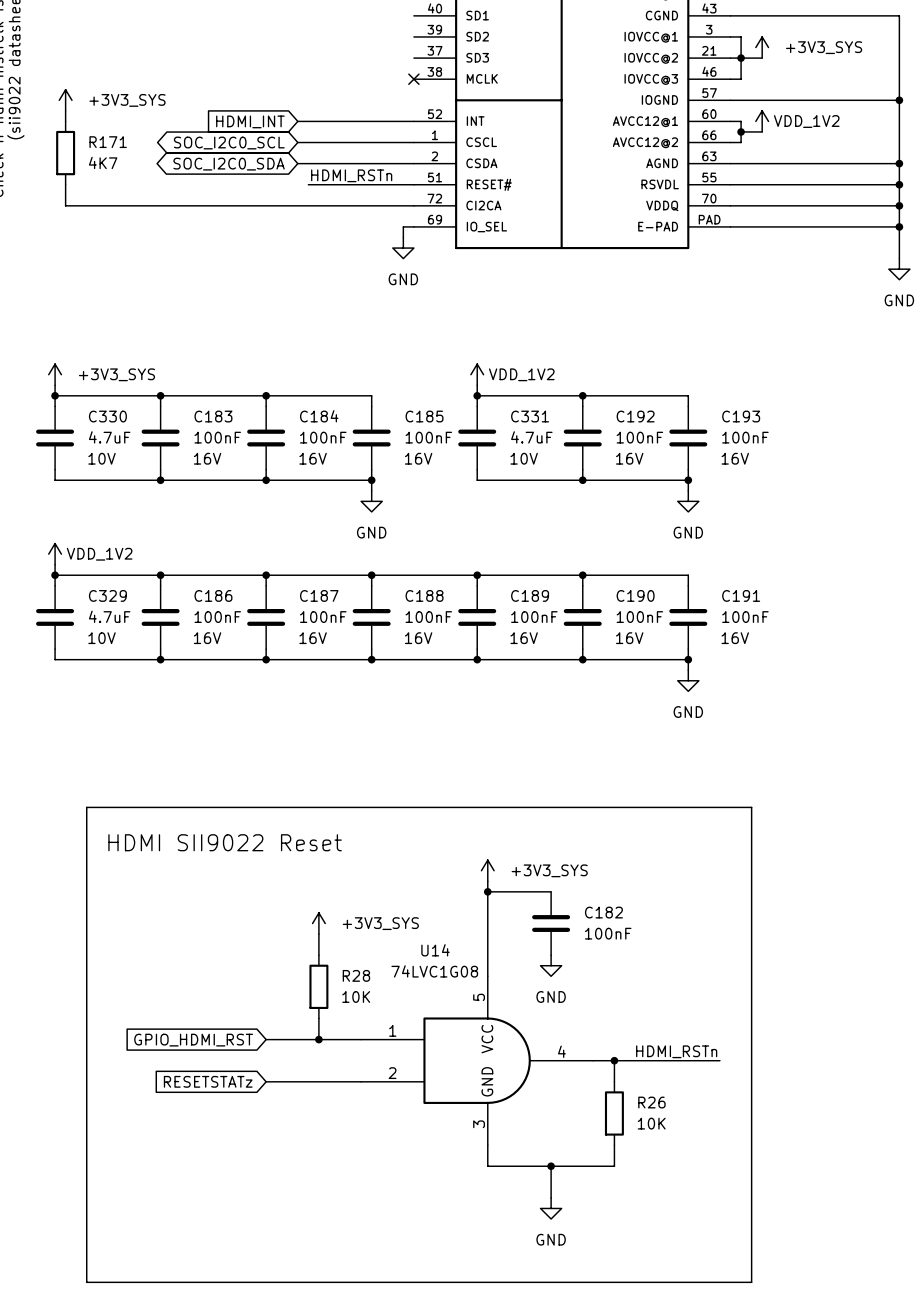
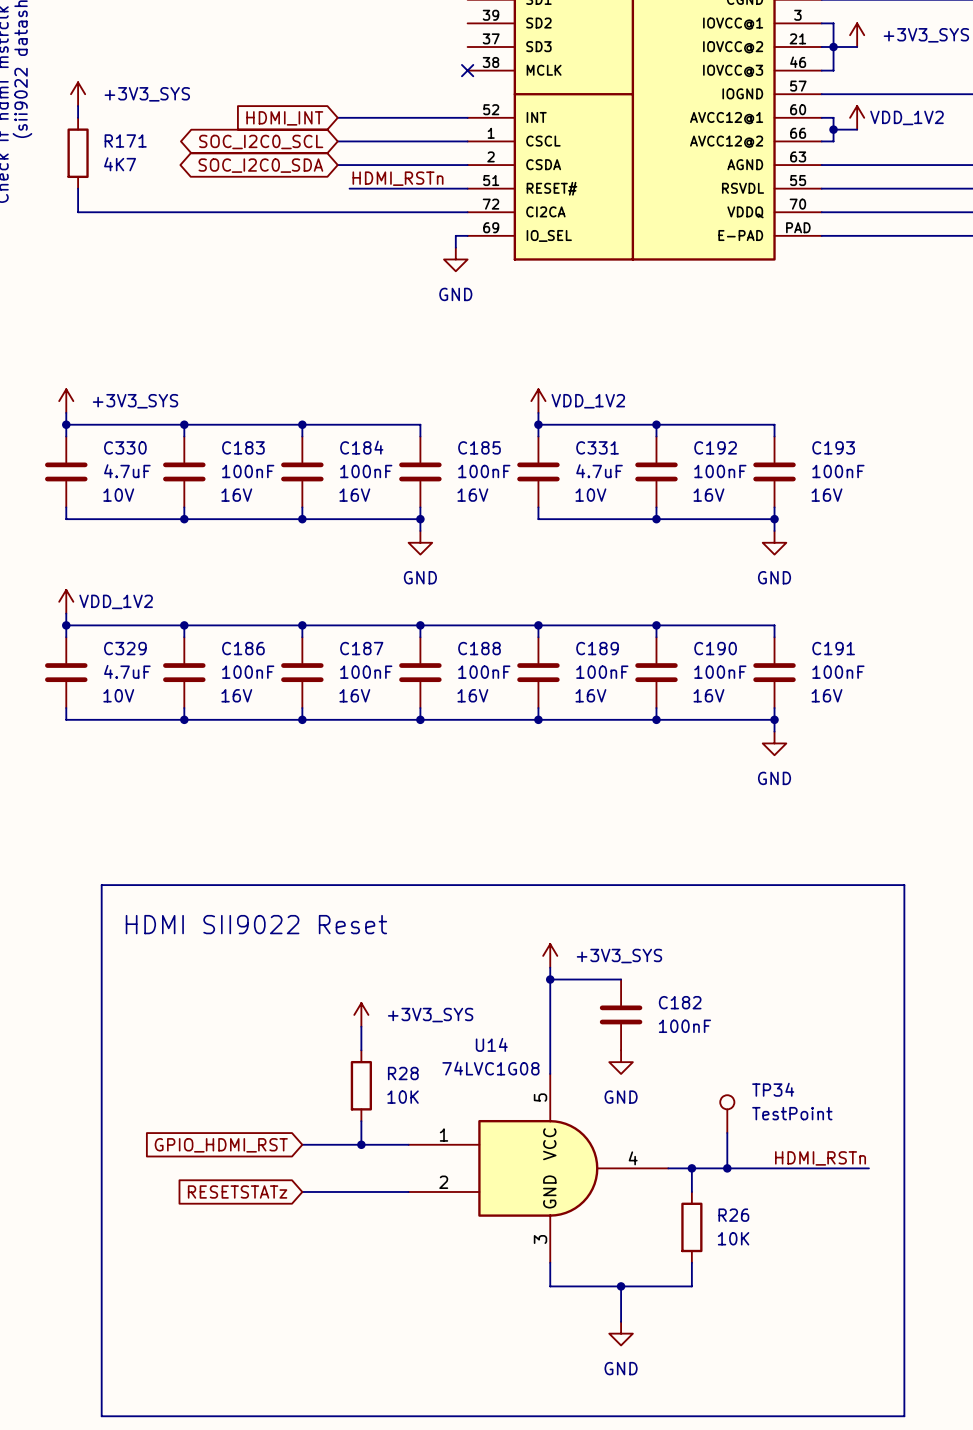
line: (751, 807) (751, 1282) -> (845, 885) (904, 885) (904, 1416) (845, 1416)
TP34: none -> TestPoint (727, 1114)
wire: none -> (727, 1132) (727, 1168)
label position: HDMI_RSTn (676, 1051) -> HDMI_RSTn (820, 1158)
junction: none -> (727, 1168)
wire: none -> (809, 1168) (868, 1168)

